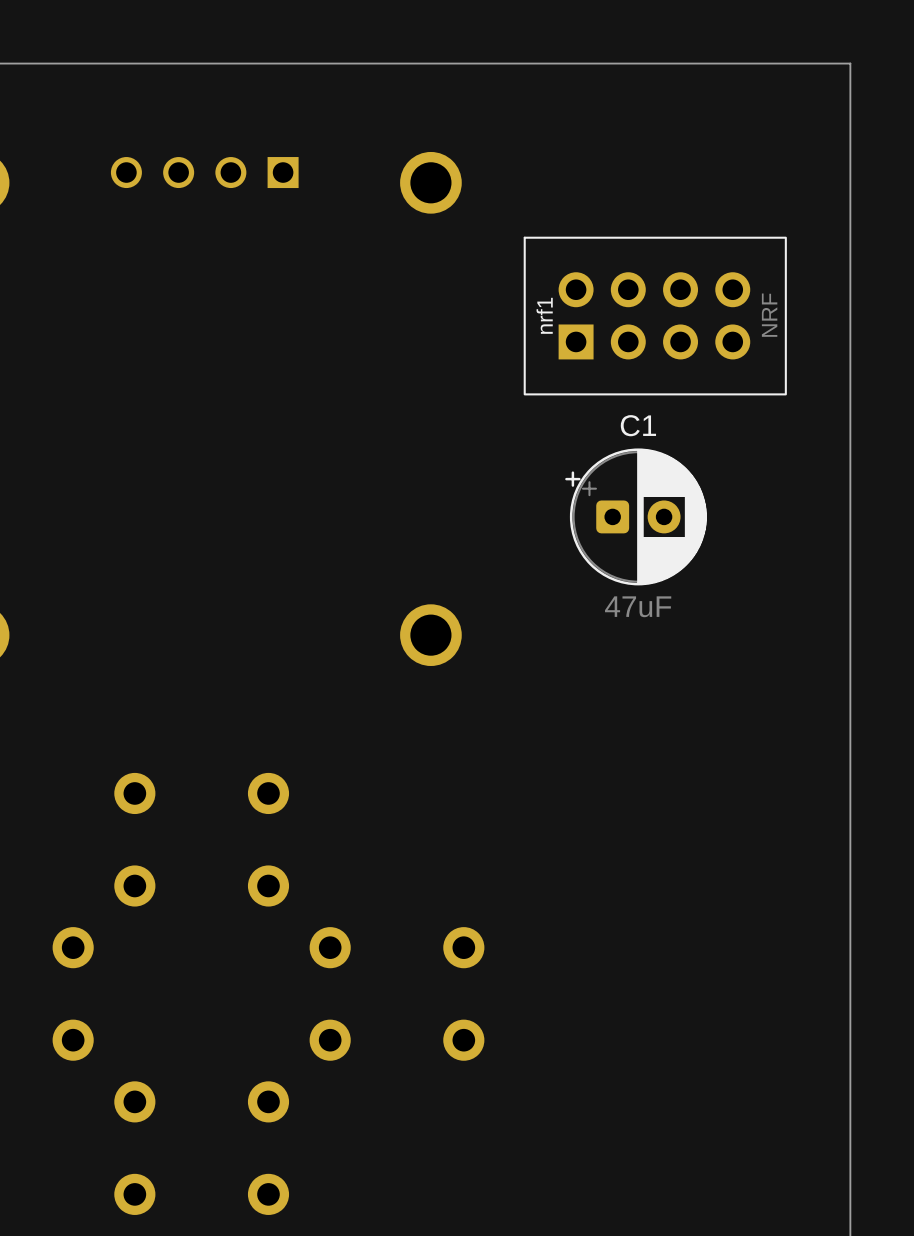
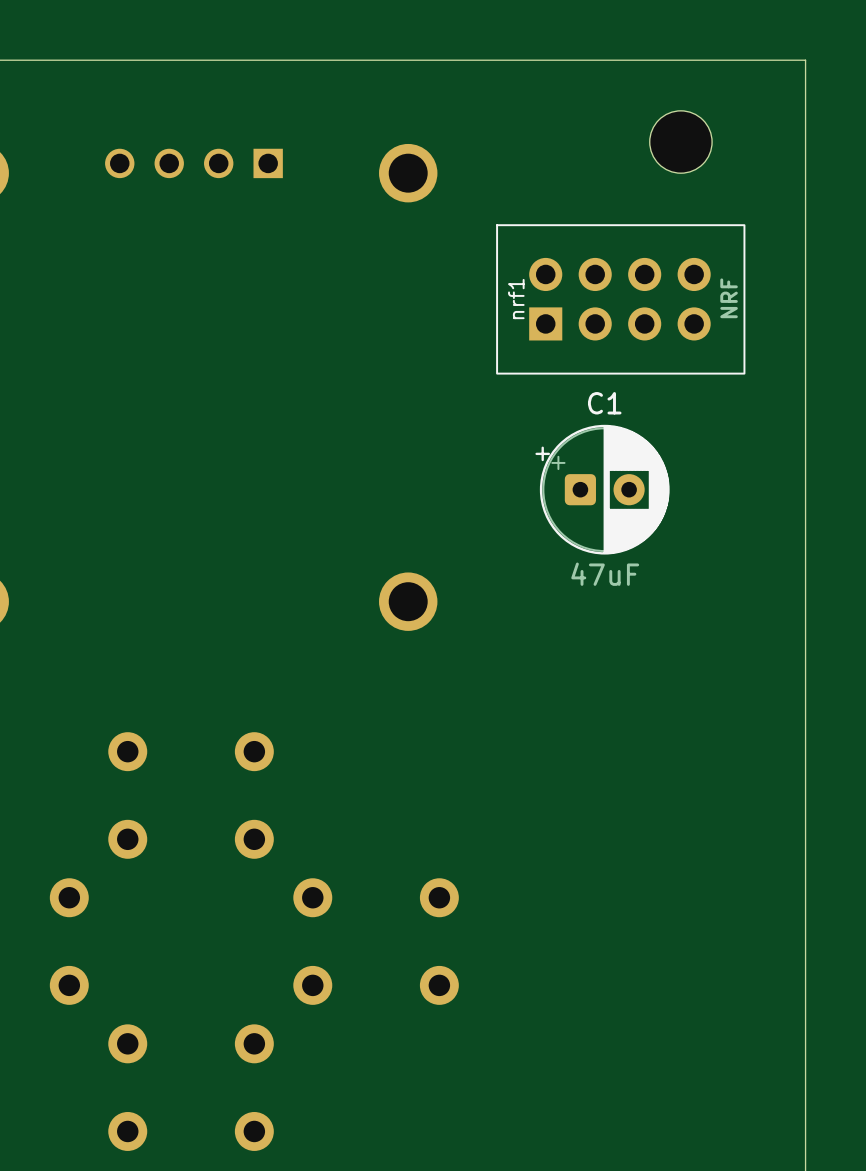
part: none -> (680, 142)

